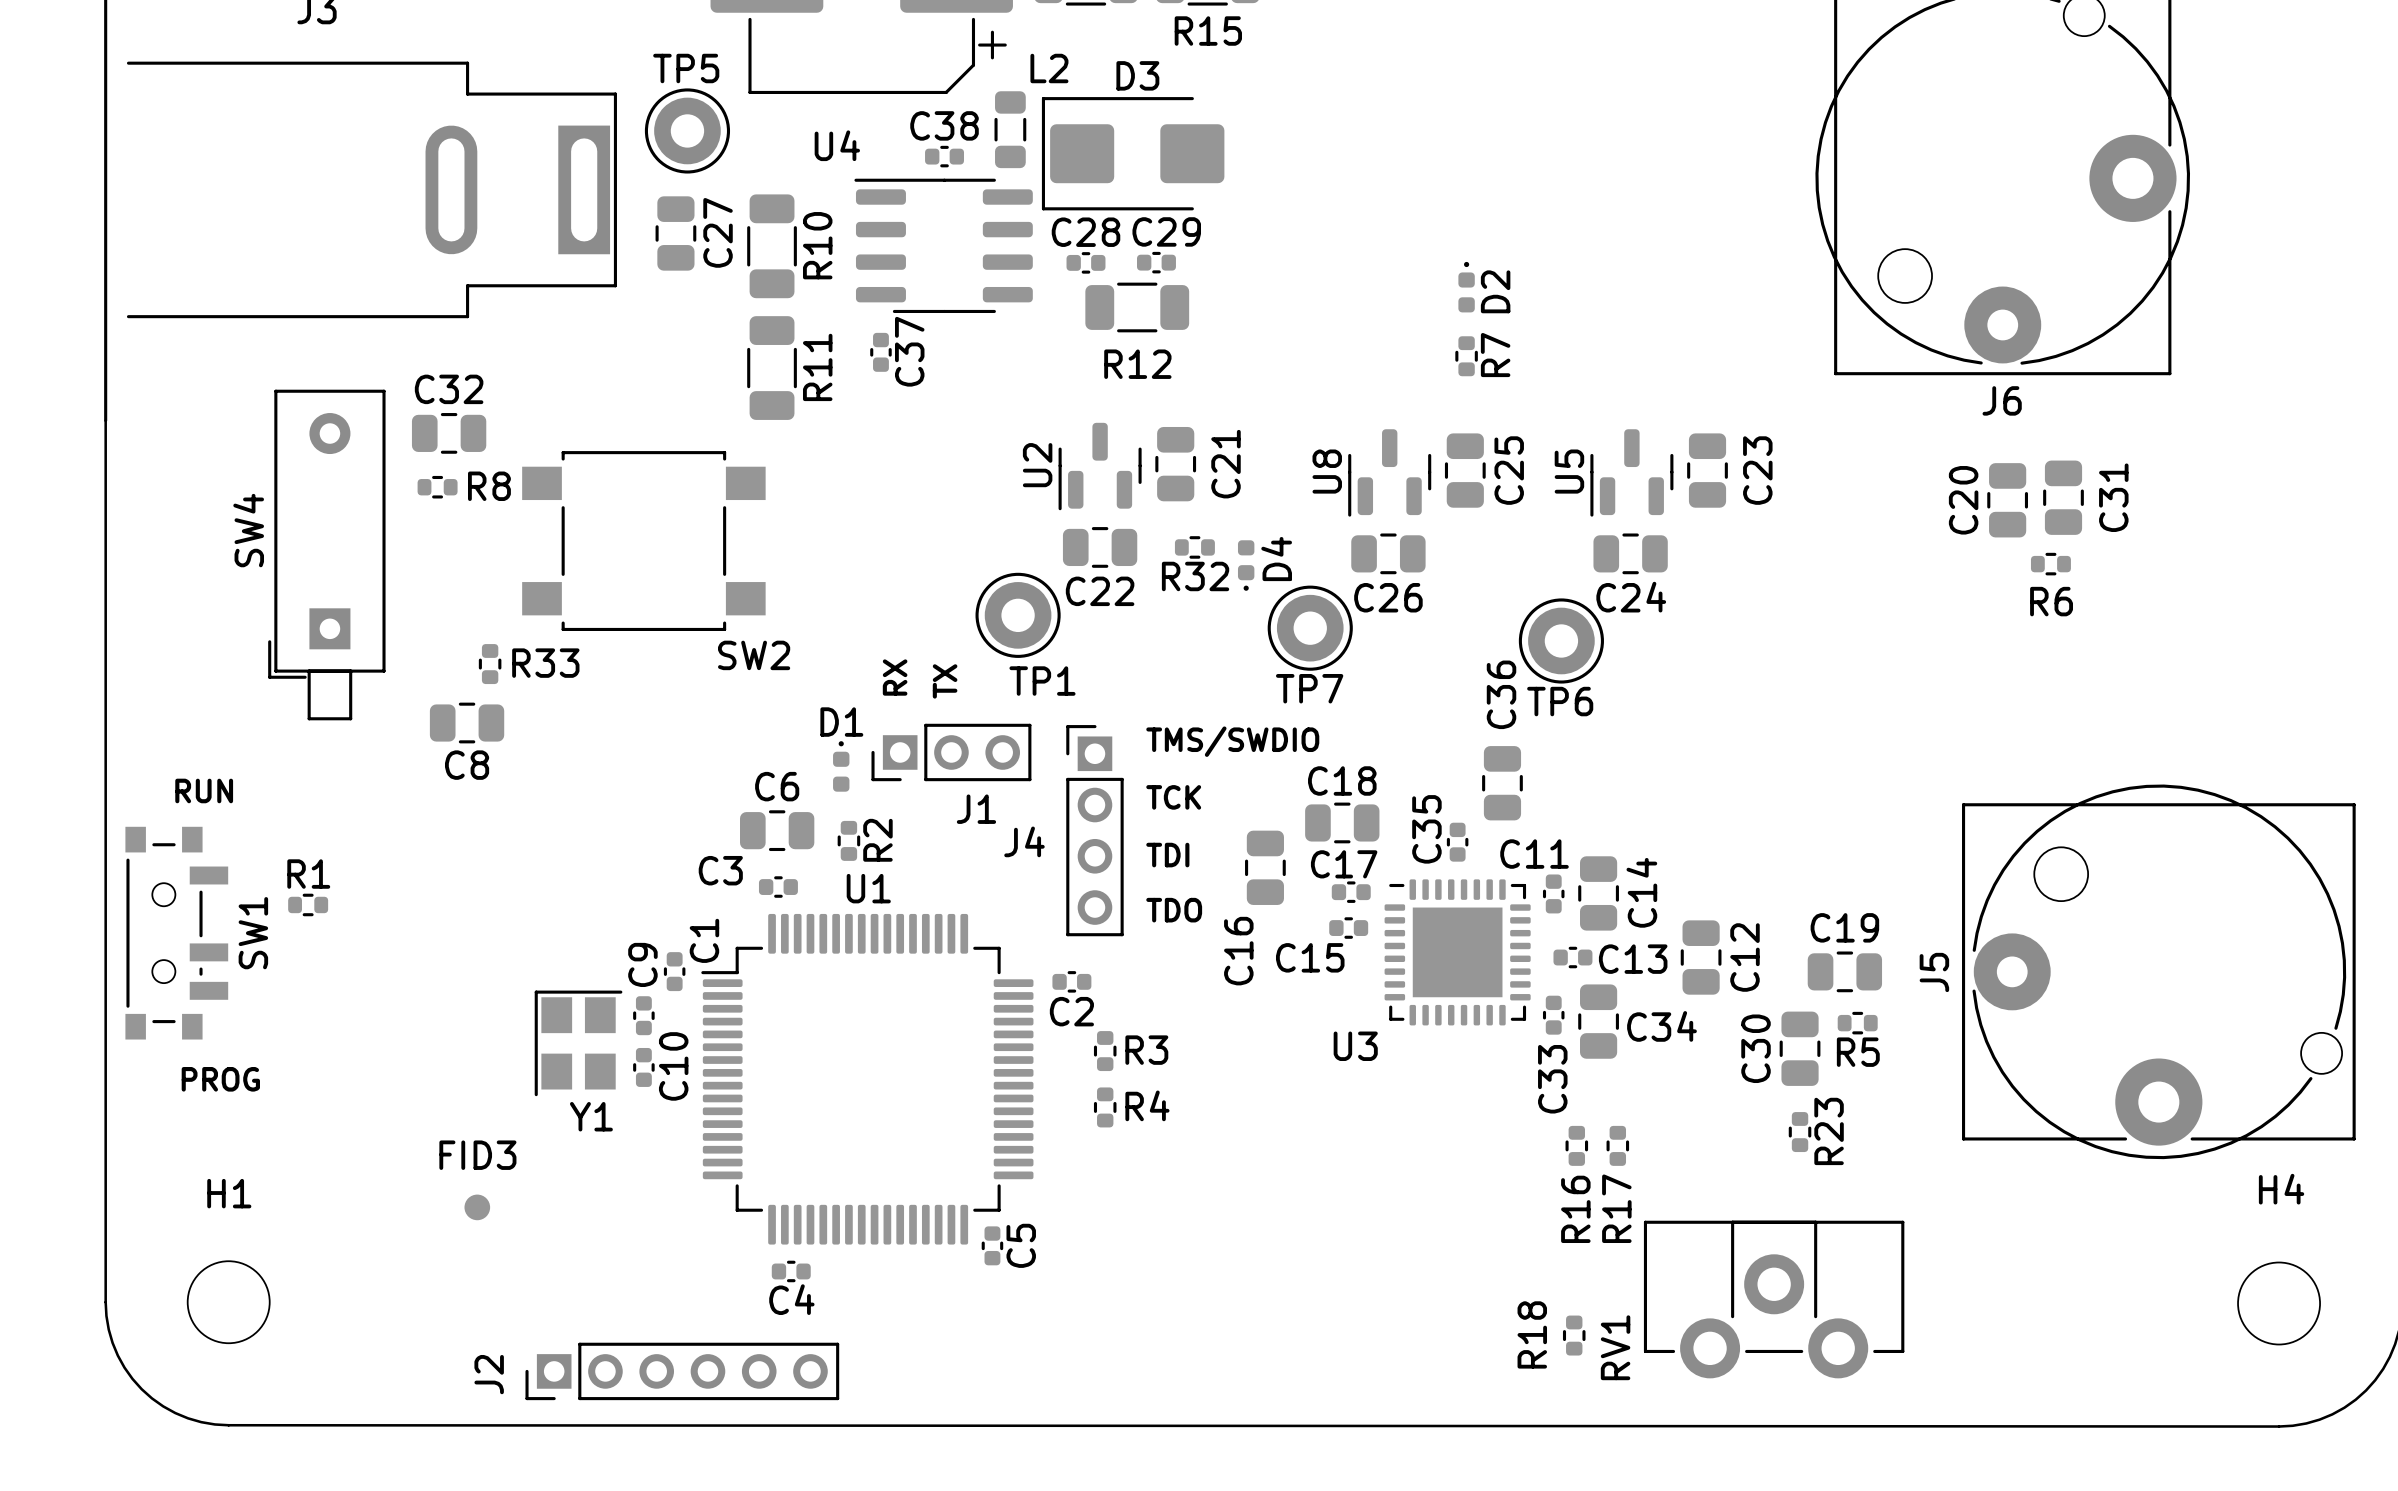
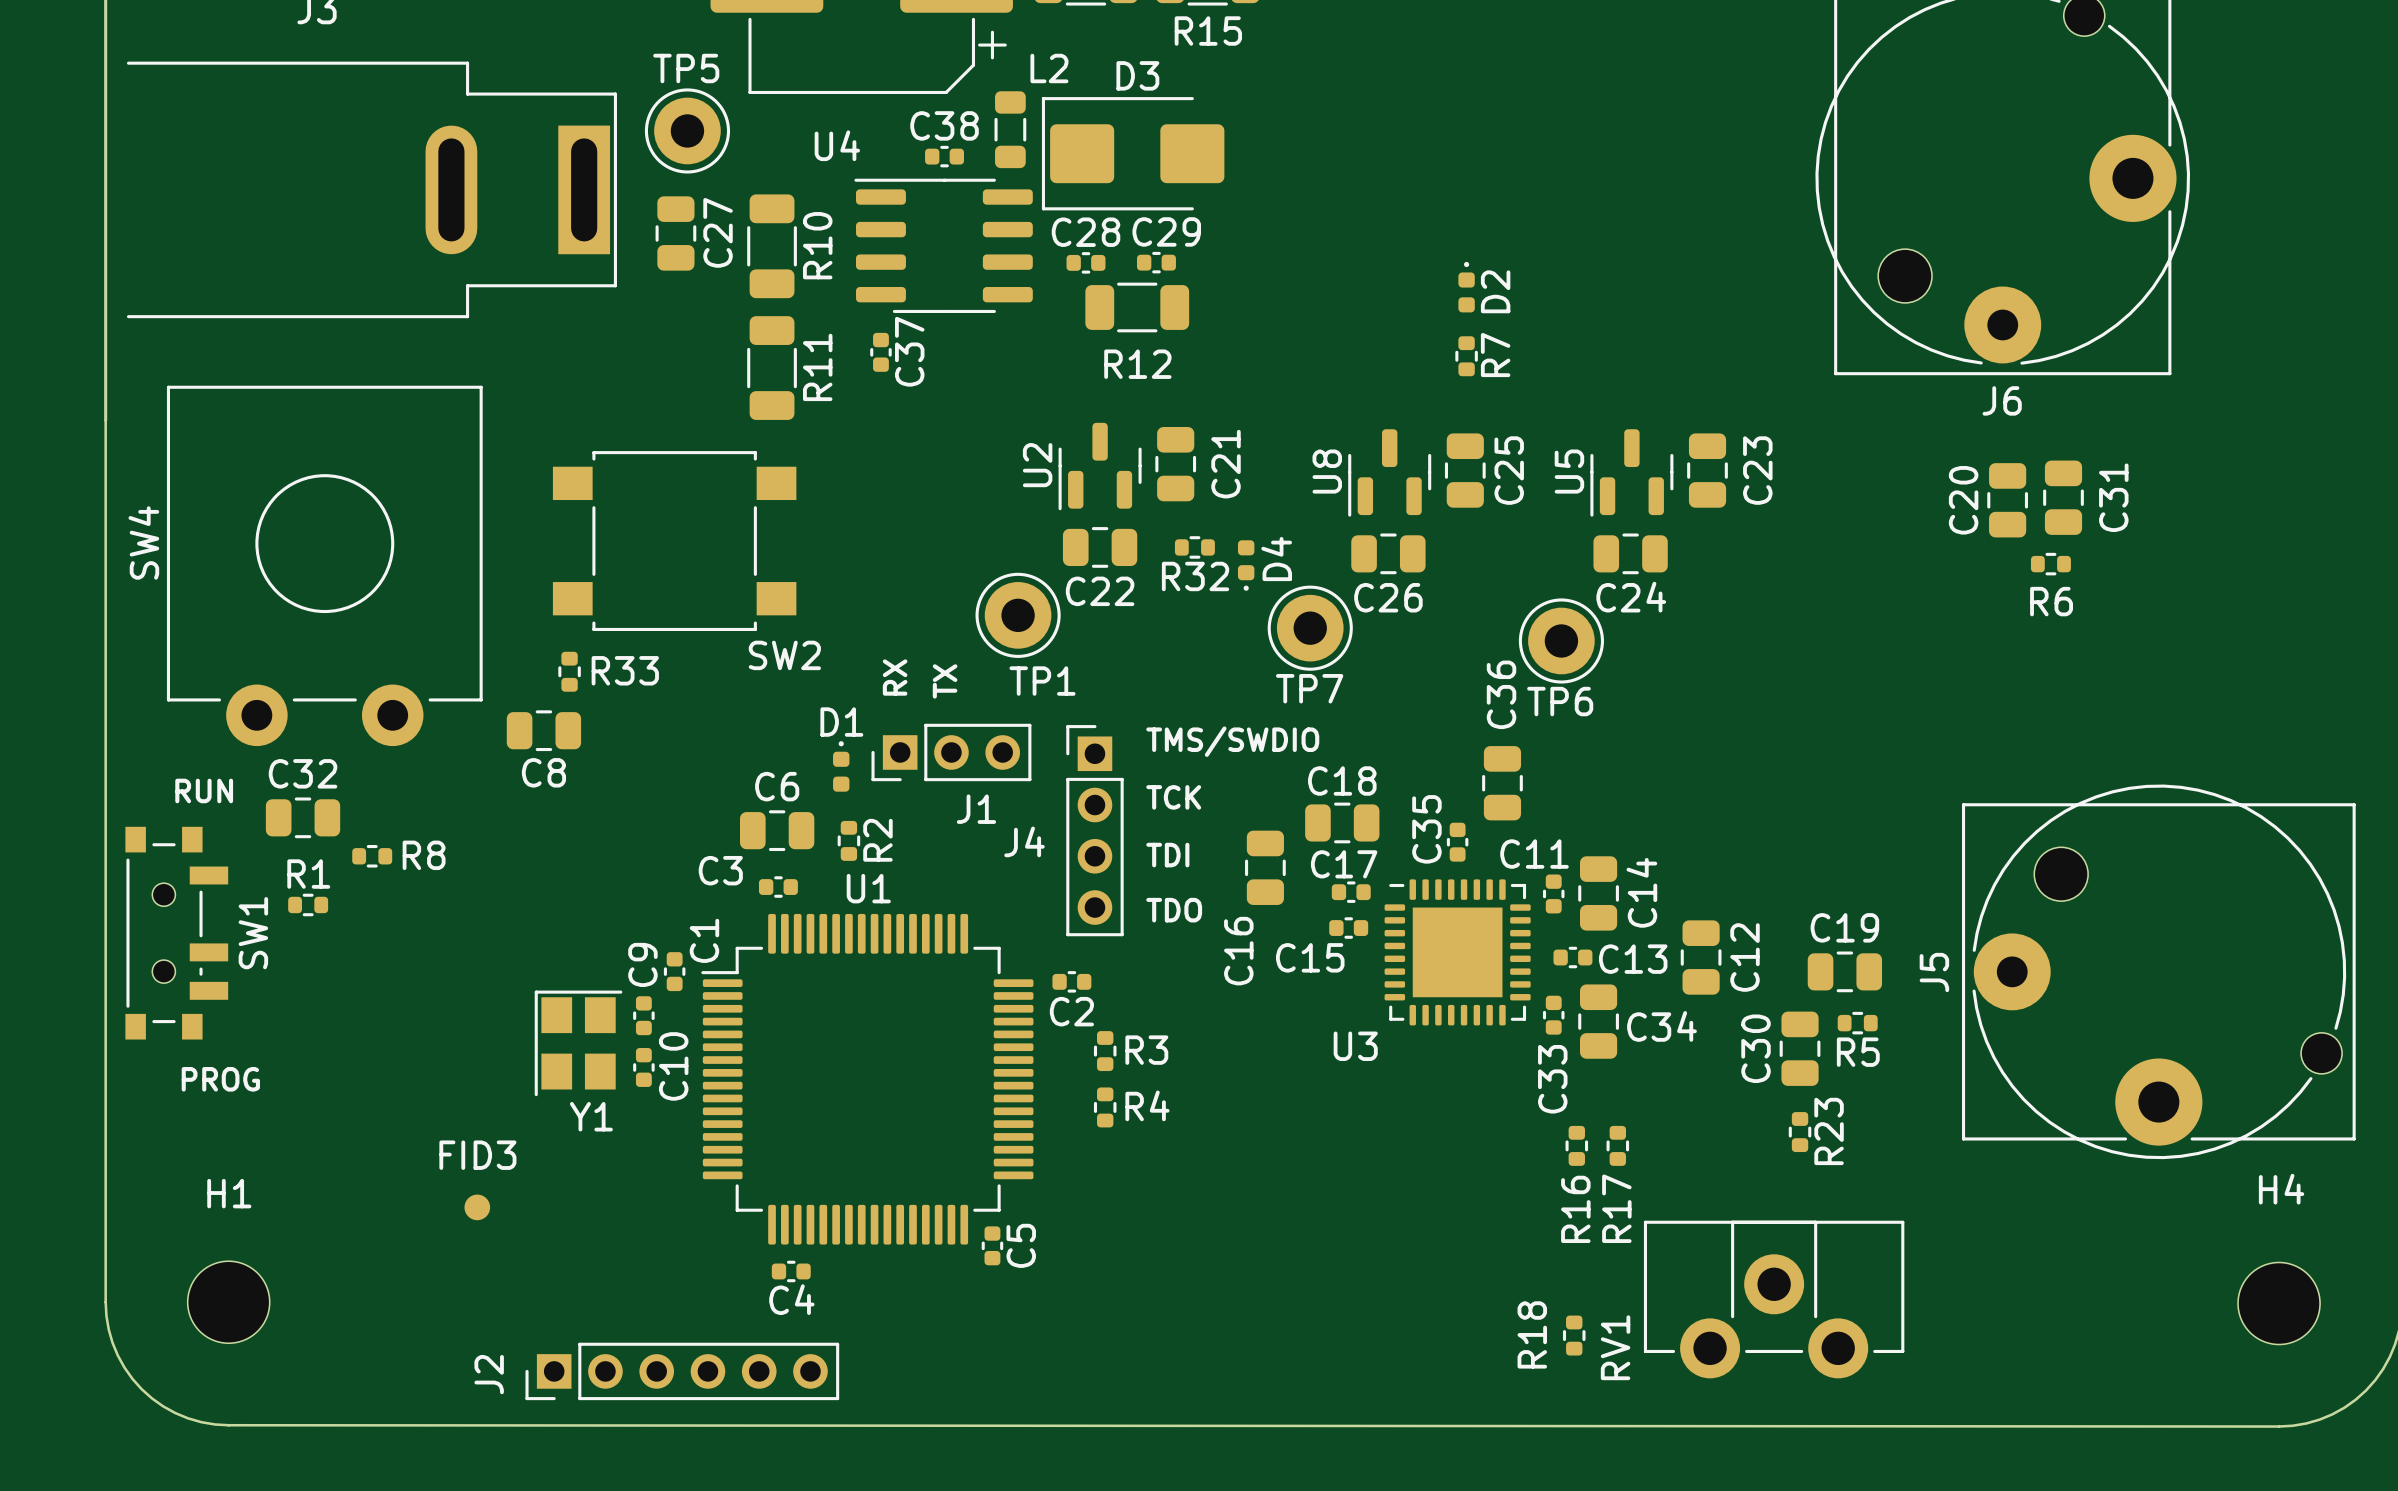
SW4 footprint: [268, 389, 386, 721] -> [166, 385, 483, 747]
C32 position: (449, 433) -> (303, 817)
R8 position: (437, 487) -> (372, 856)
SW4 name position: SW4 (248, 530) -> SW4 (143, 542)
SW2 position: (643, 541) -> (674, 541)
R33 position: (490, 664) -> (569, 671)
C8 position: (467, 723) -> (543, 730)

